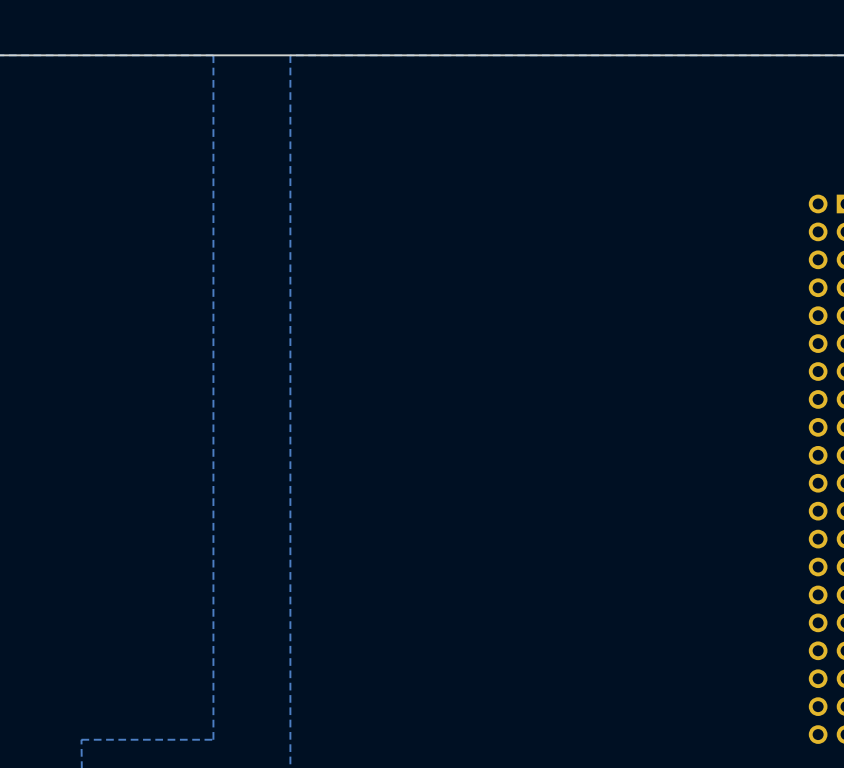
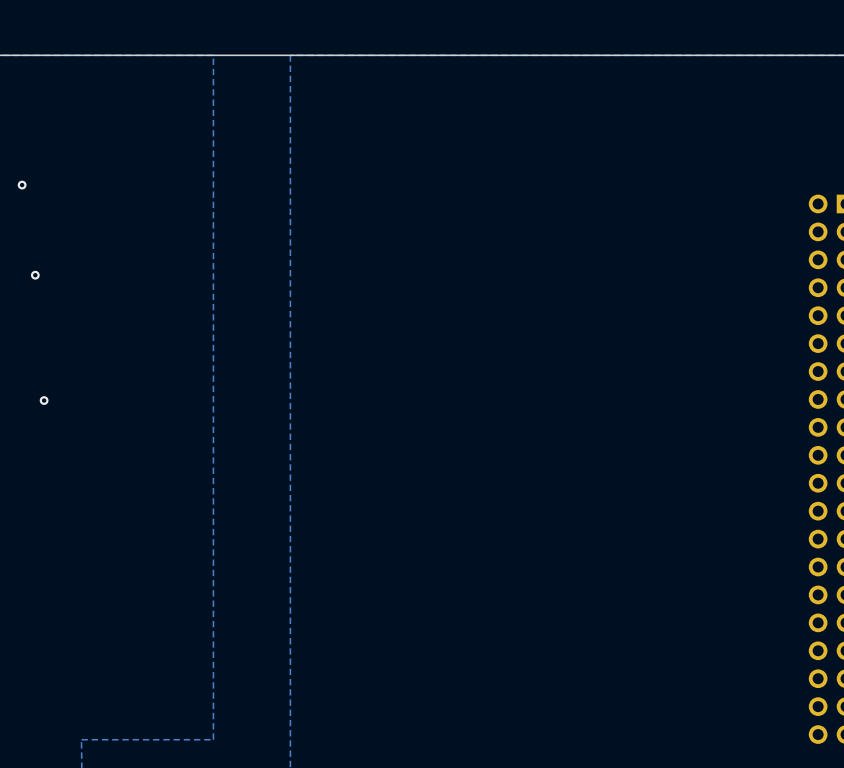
via: none -> (22, 185)
via: none -> (35, 275)
via: none -> (44, 400)

